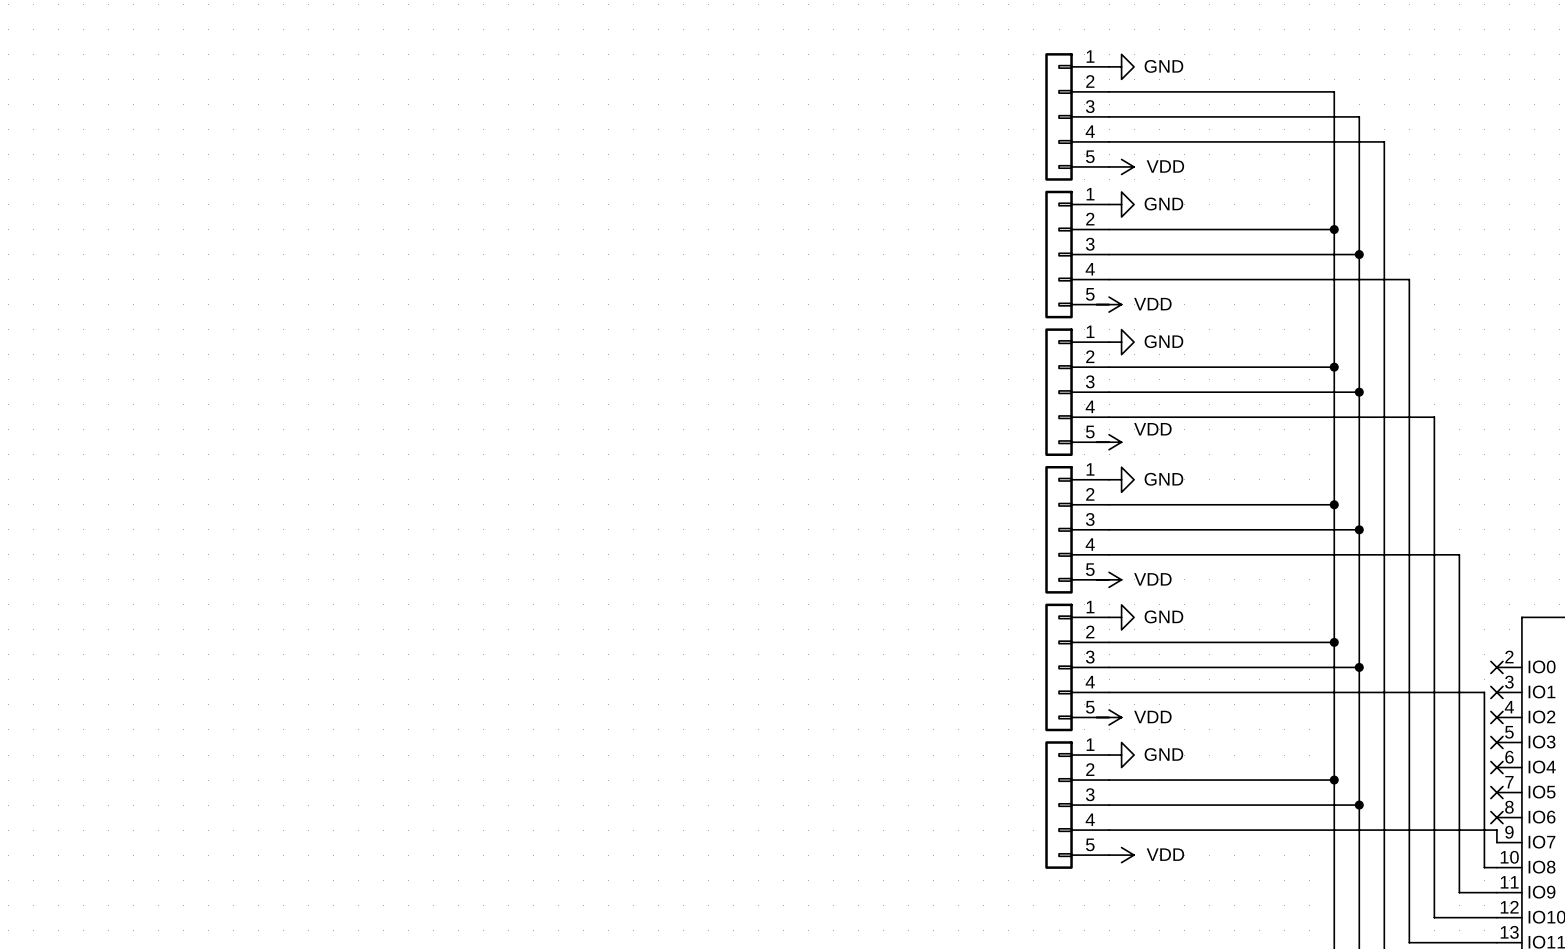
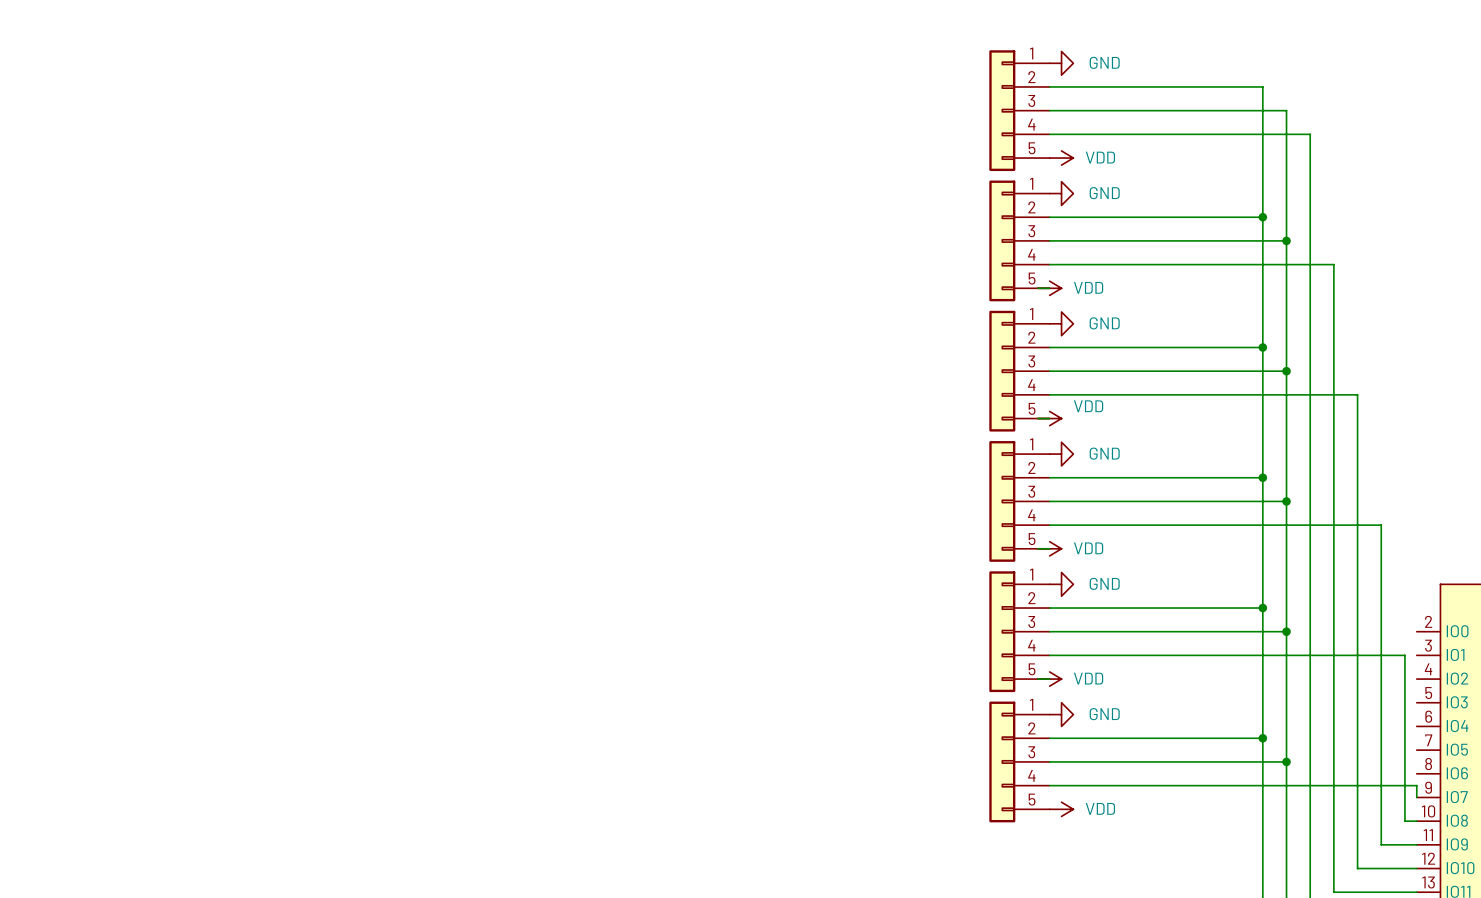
no-connect mark: (1496, 667) -> none
no-connect mark: (1496, 692) -> none
no-connect mark: (1496, 717) -> none
no-connect mark: (1496, 742) -> none
no-connect mark: (1496, 767) -> none
no-connect mark: (1496, 792) -> none
no-connect mark: (1496, 817) -> none

